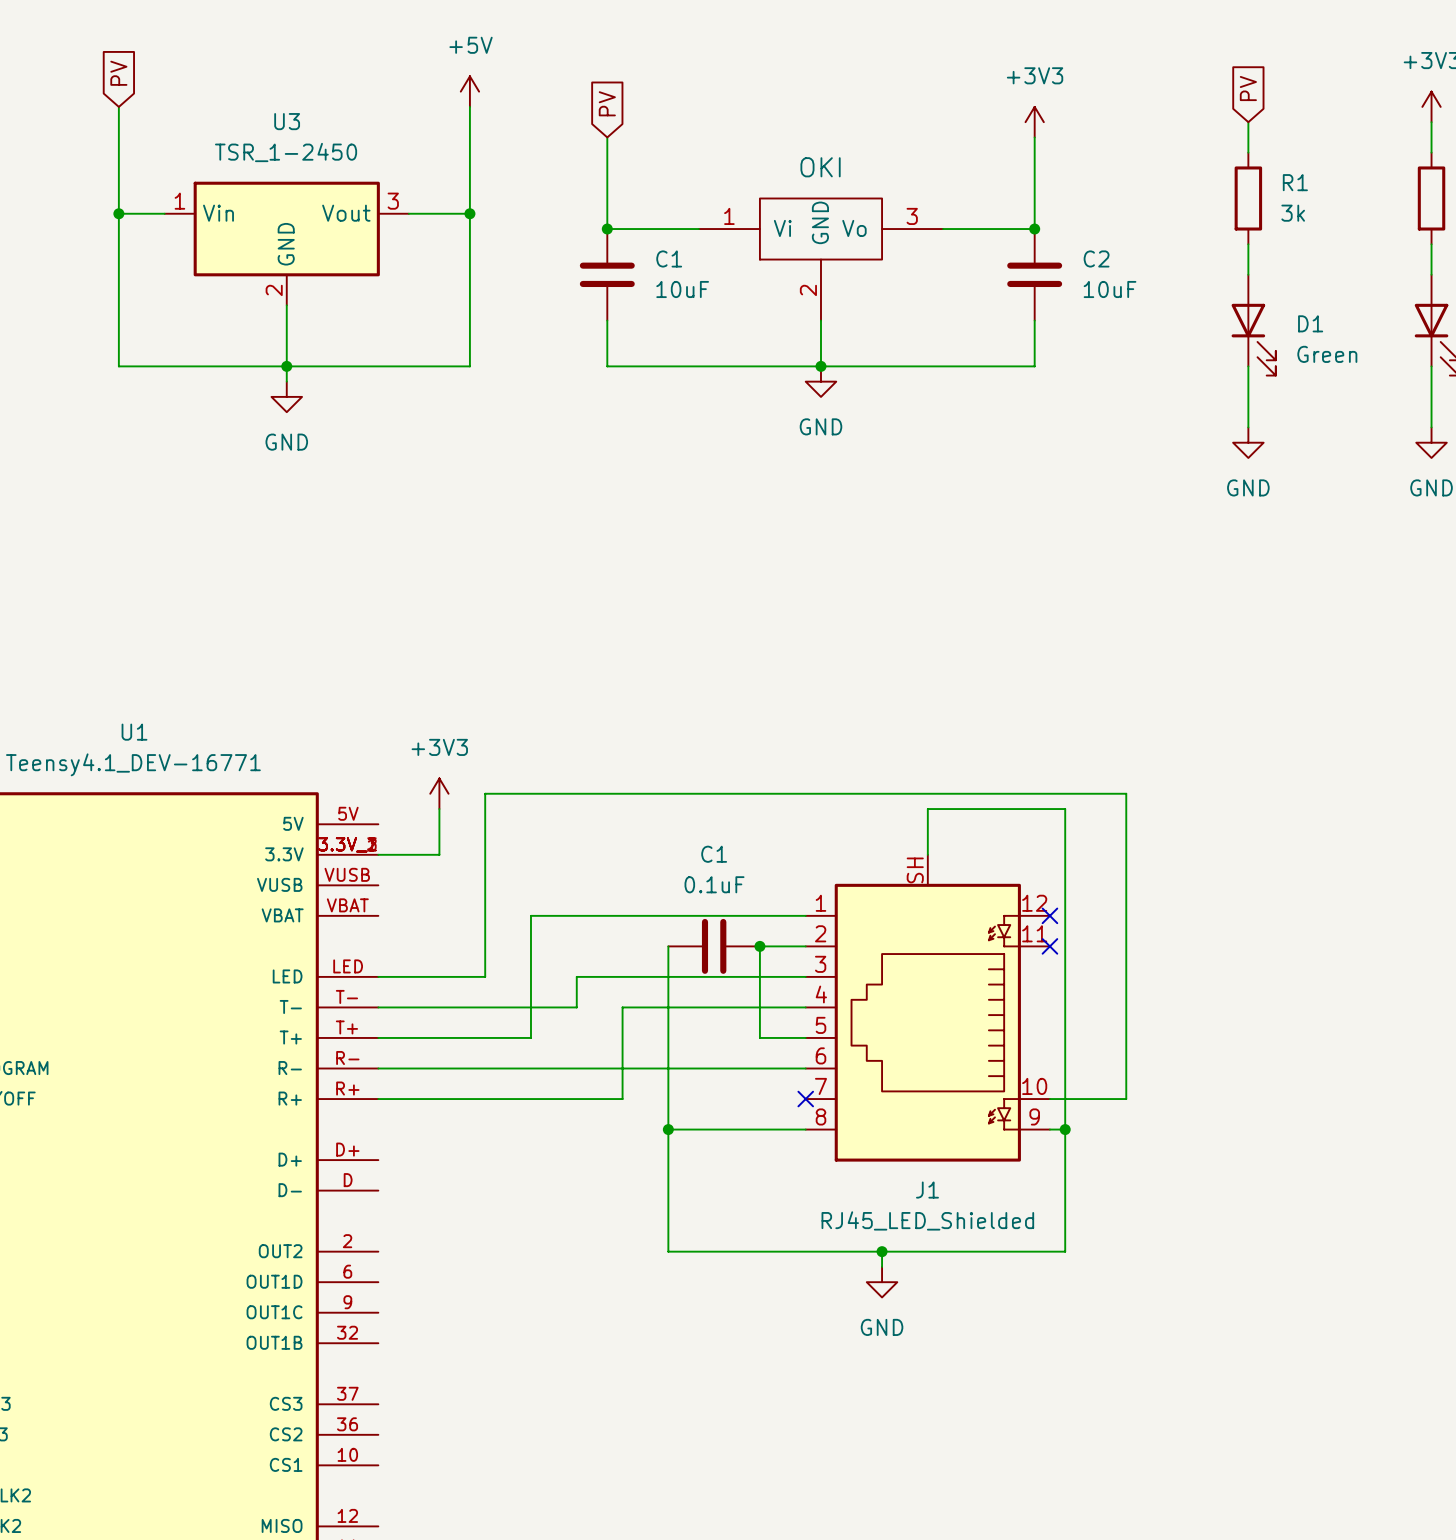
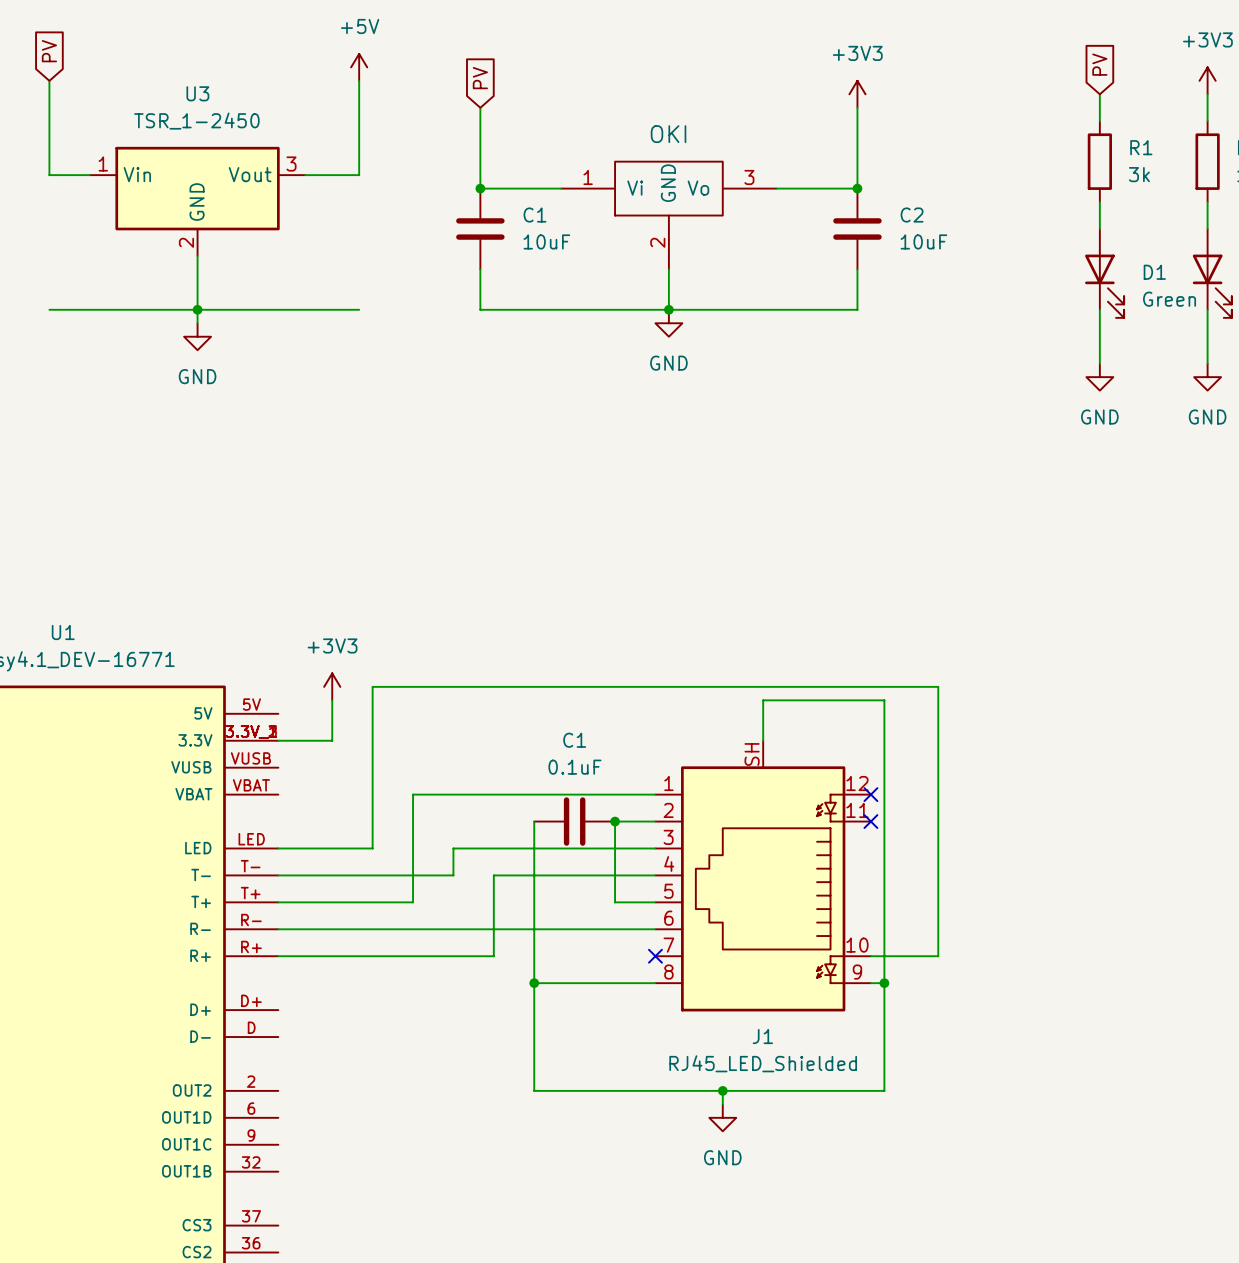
global label position: PV (1248, 88) -> PV (1099, 64)
wire: (1248, 122) (1248, 152) -> (1099, 94) (1099, 121)
R1 position: (1248, 198) -> (1099, 161)
wire: (118, 213) (118, 366) -> none
junction: (118, 213) -> none
wire: (469, 213) (469, 366) -> none
junction: (469, 213) -> none
wire: (1248, 244) (1248, 274) -> (1099, 202) (1099, 228)
D1 position: (1253, 325) -> (1104, 273)
wire: (1248, 366) (1248, 427) -> (1099, 309) (1099, 363)
power symbol position: GND (1248, 442) -> GND (1099, 377)

